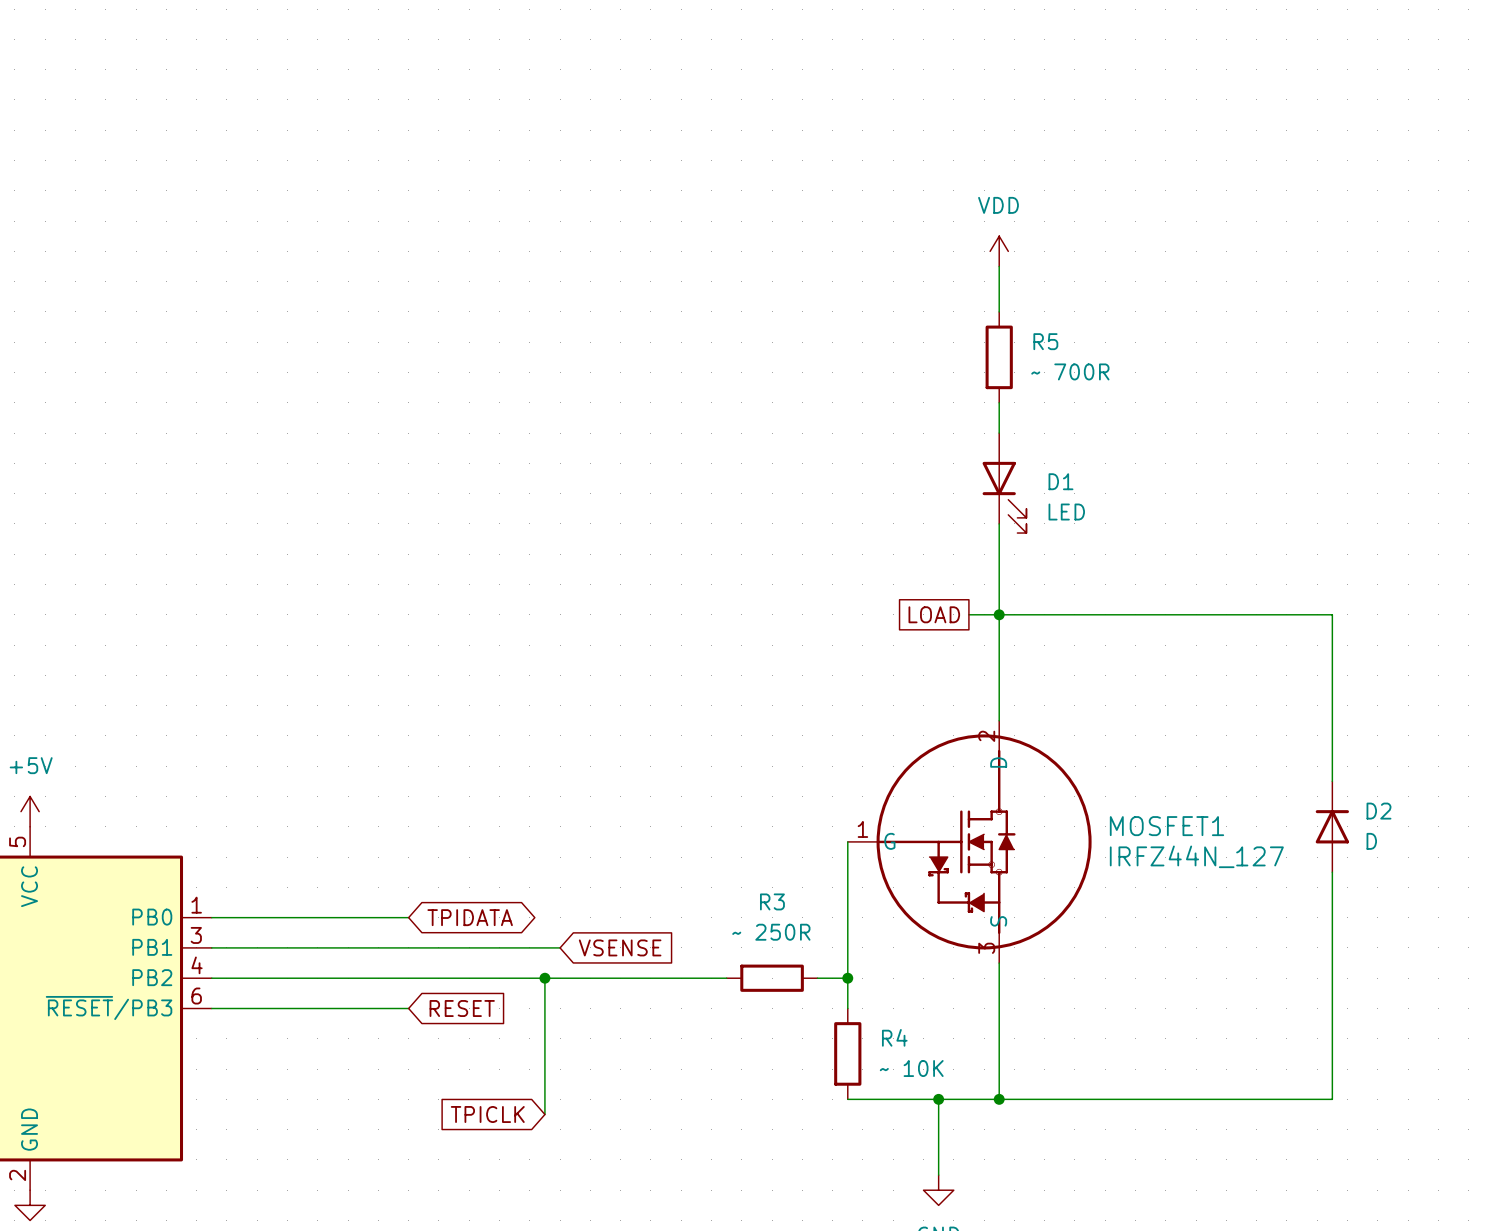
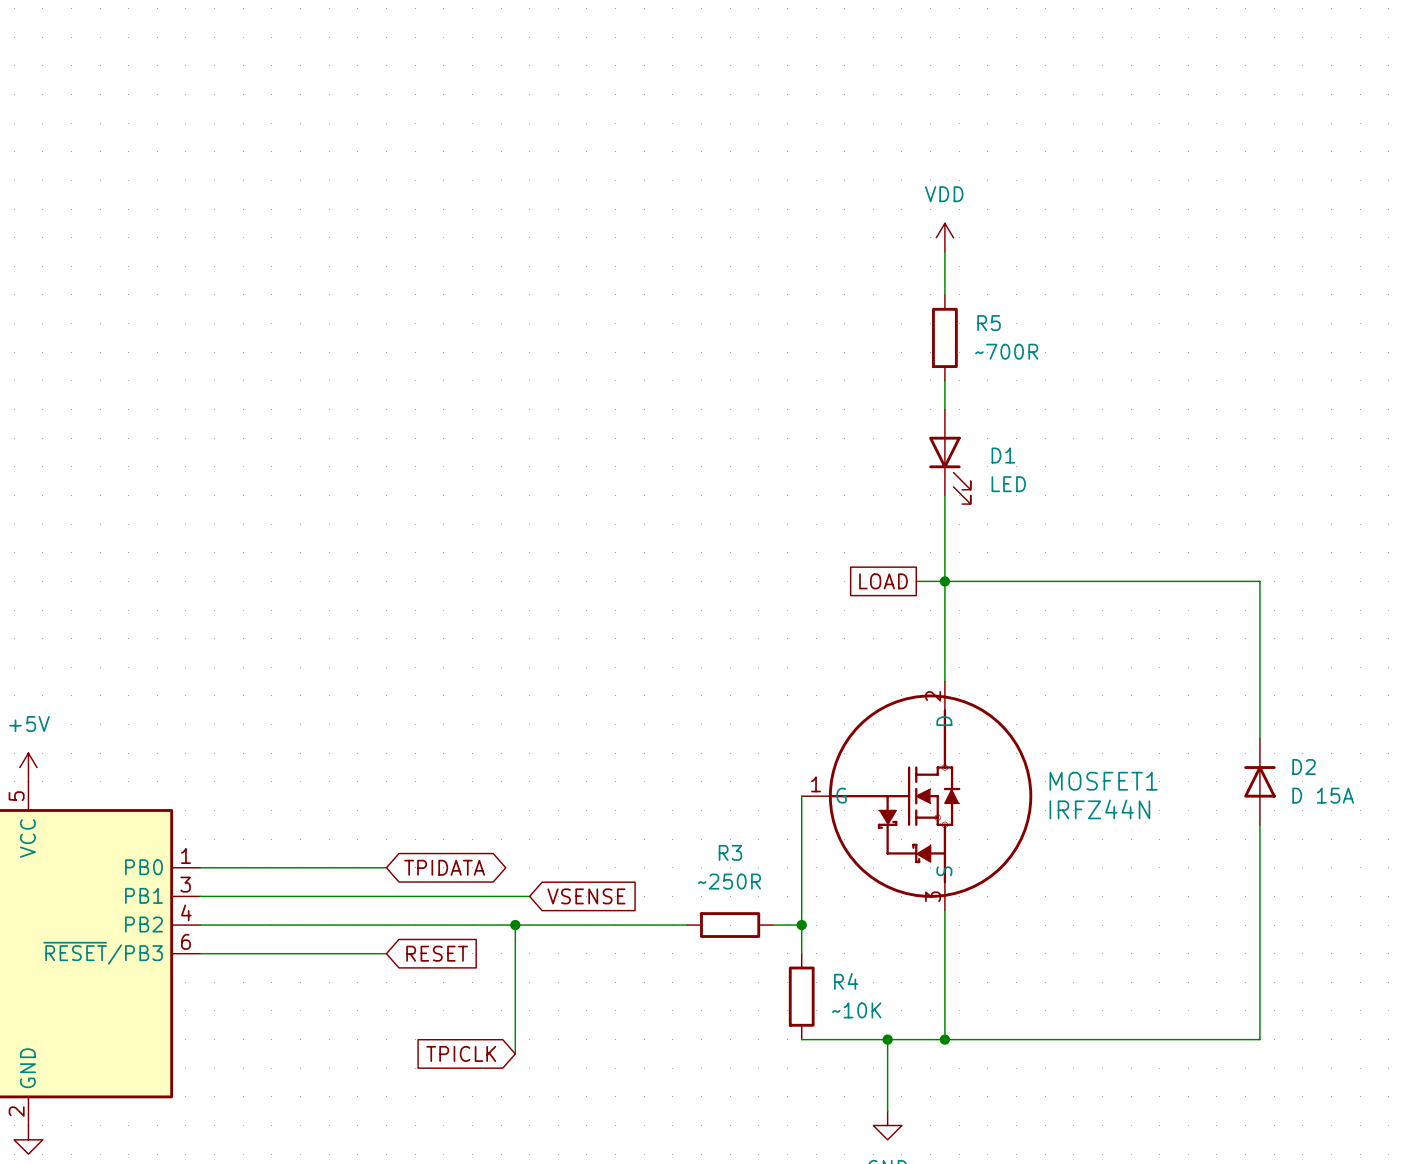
R5 value: ~ 700R (1070, 371) -> ~700R (1006, 351)
D2 value: D (1371, 841) -> D 15A (1323, 795)
MOSFET1 value: IRFZ44N_127 (1196, 856) -> IRFZ44N (1099, 809)
R3 value: ~ 250R (771, 932) -> ~250R (729, 881)
R4 value: ~ 10K (911, 1068) -> ~10K (856, 1010)

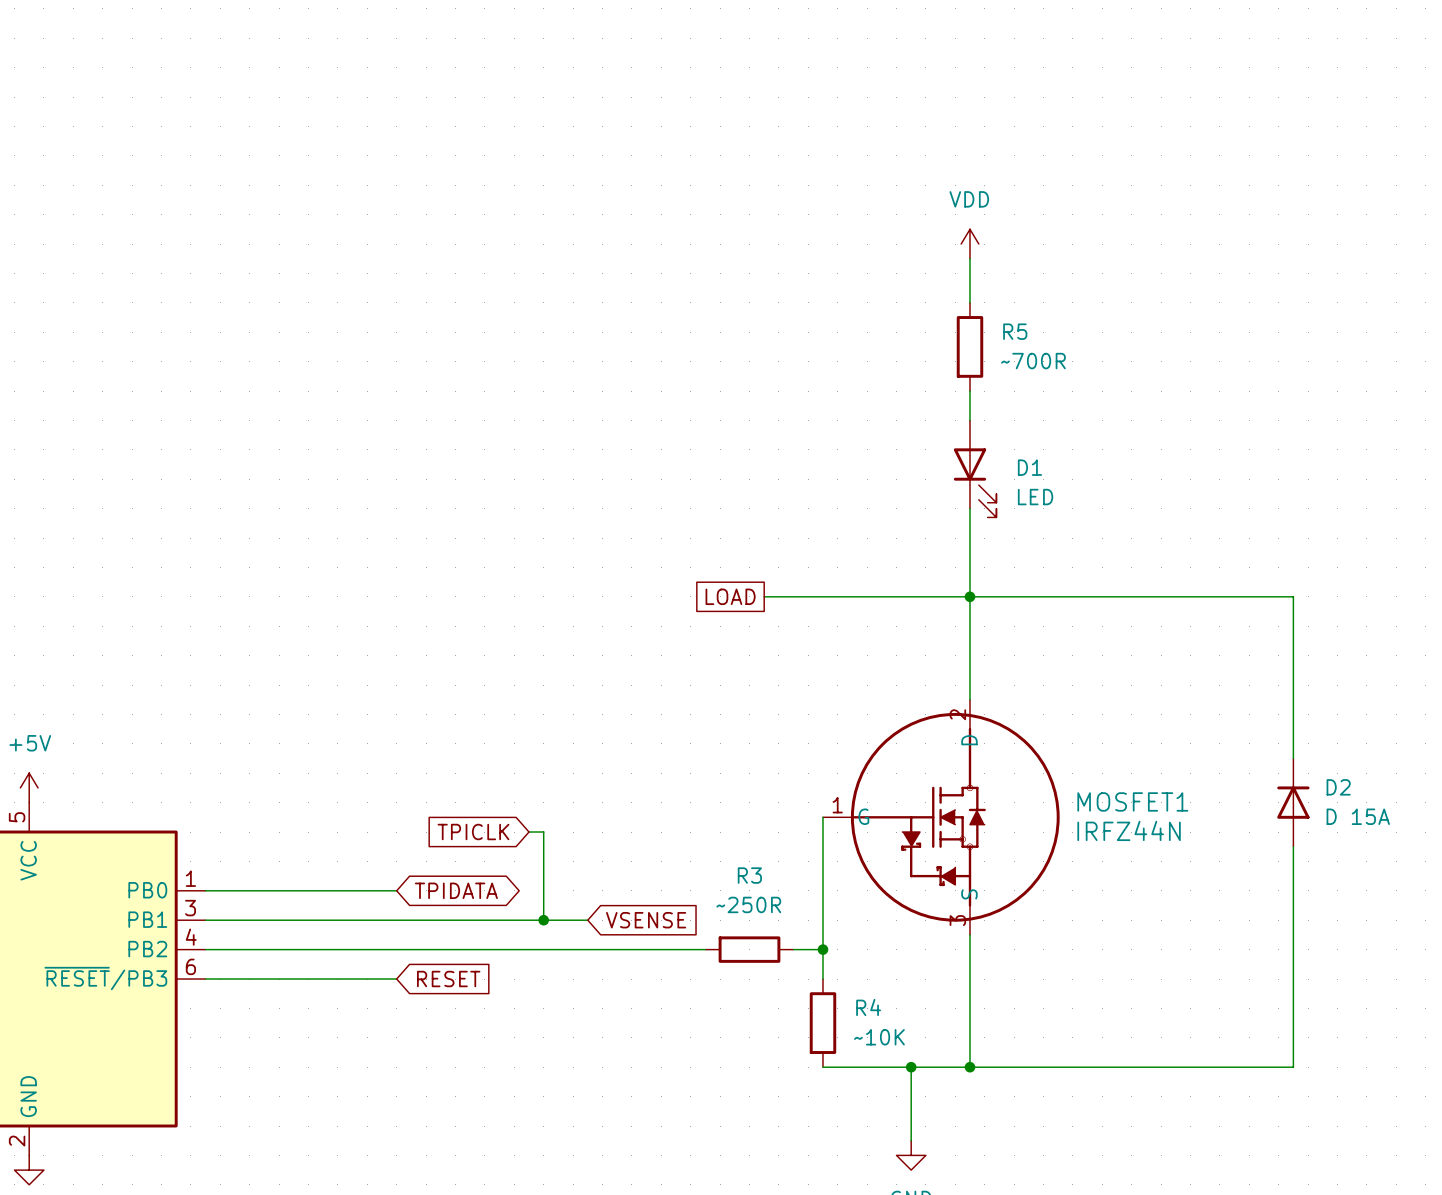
wire: none -> (764, 596) (940, 596)
global label position: LOAD (883, 581) -> LOAD (730, 596)
wire: none -> (528, 832) (543, 832) (543, 920) (587, 920)
global label position: VSENSE (586, 896) -> VSENSE (646, 920)
wire: (515, 925) (515, 1053) -> none
junction position: (515, 925) -> (543, 920)
global label position: TPICLK (461, 1053) -> TPICLK (473, 832)

